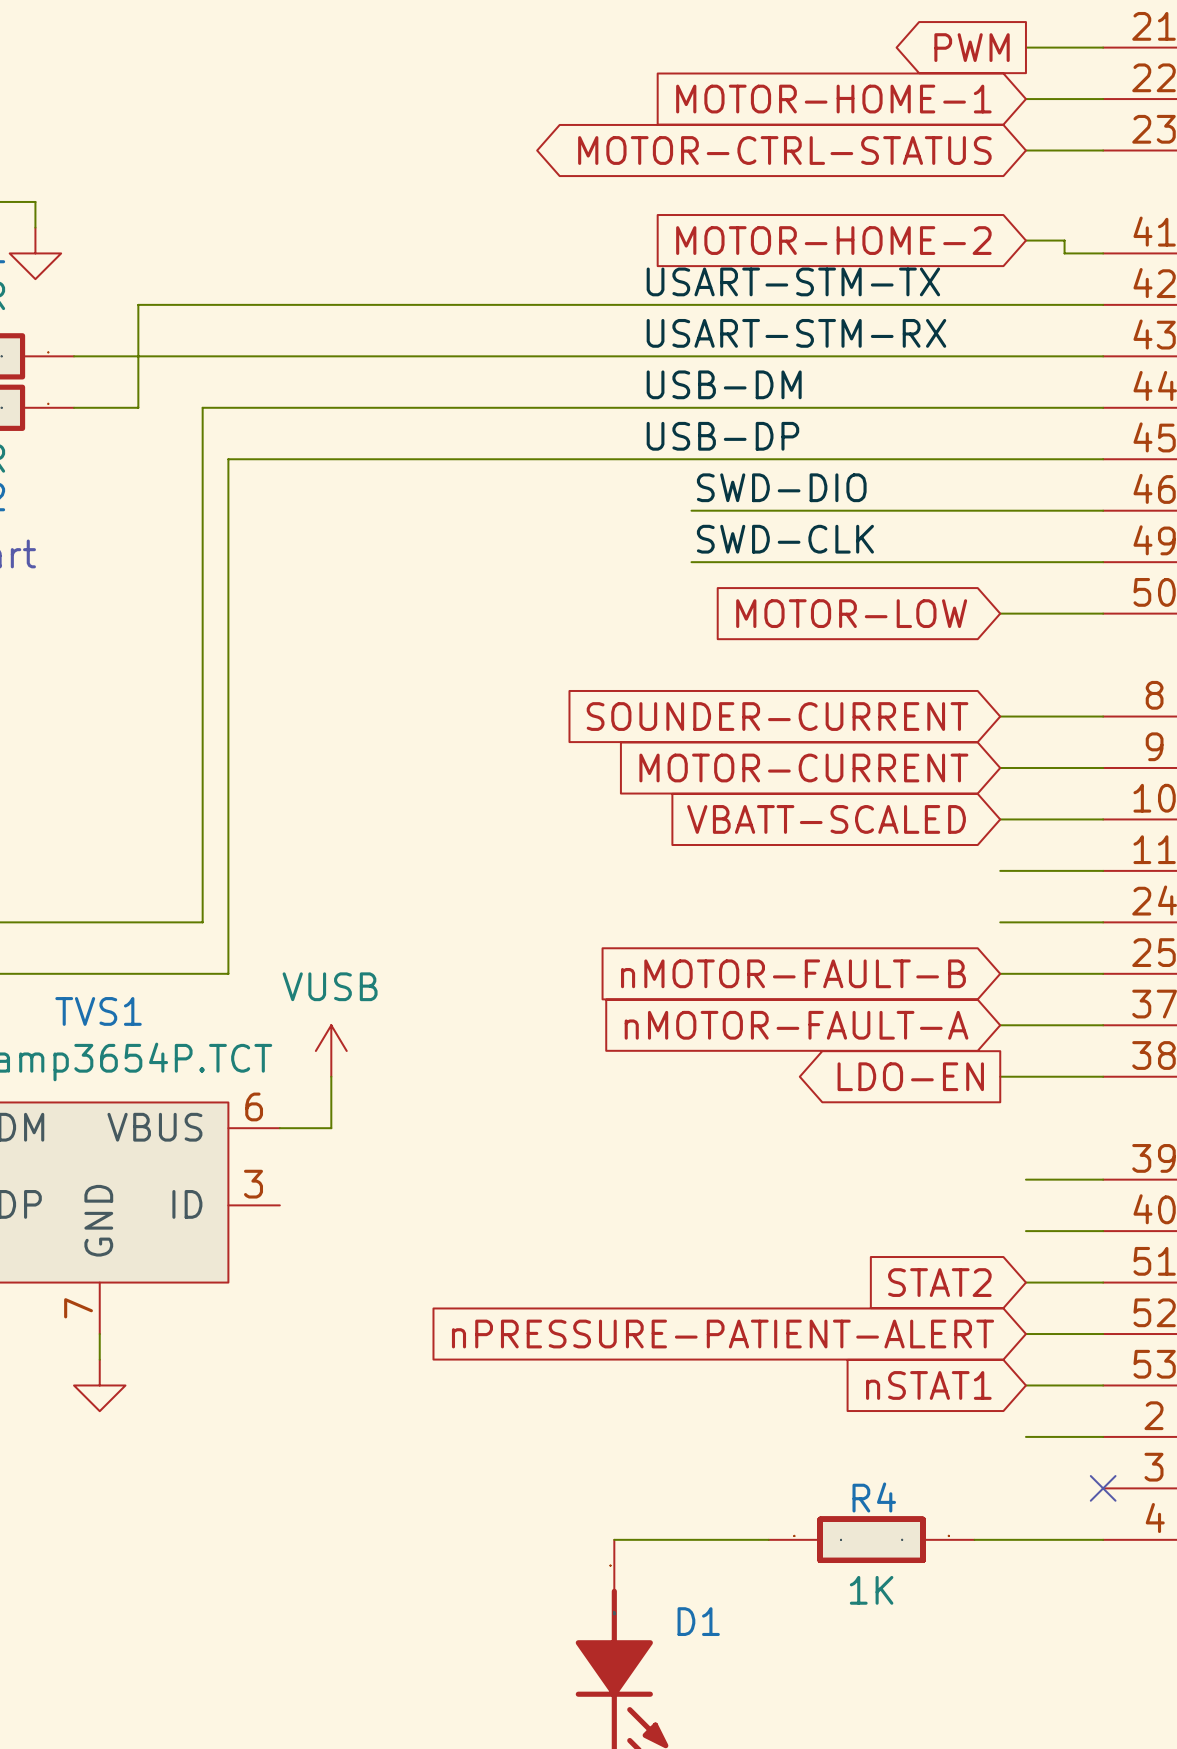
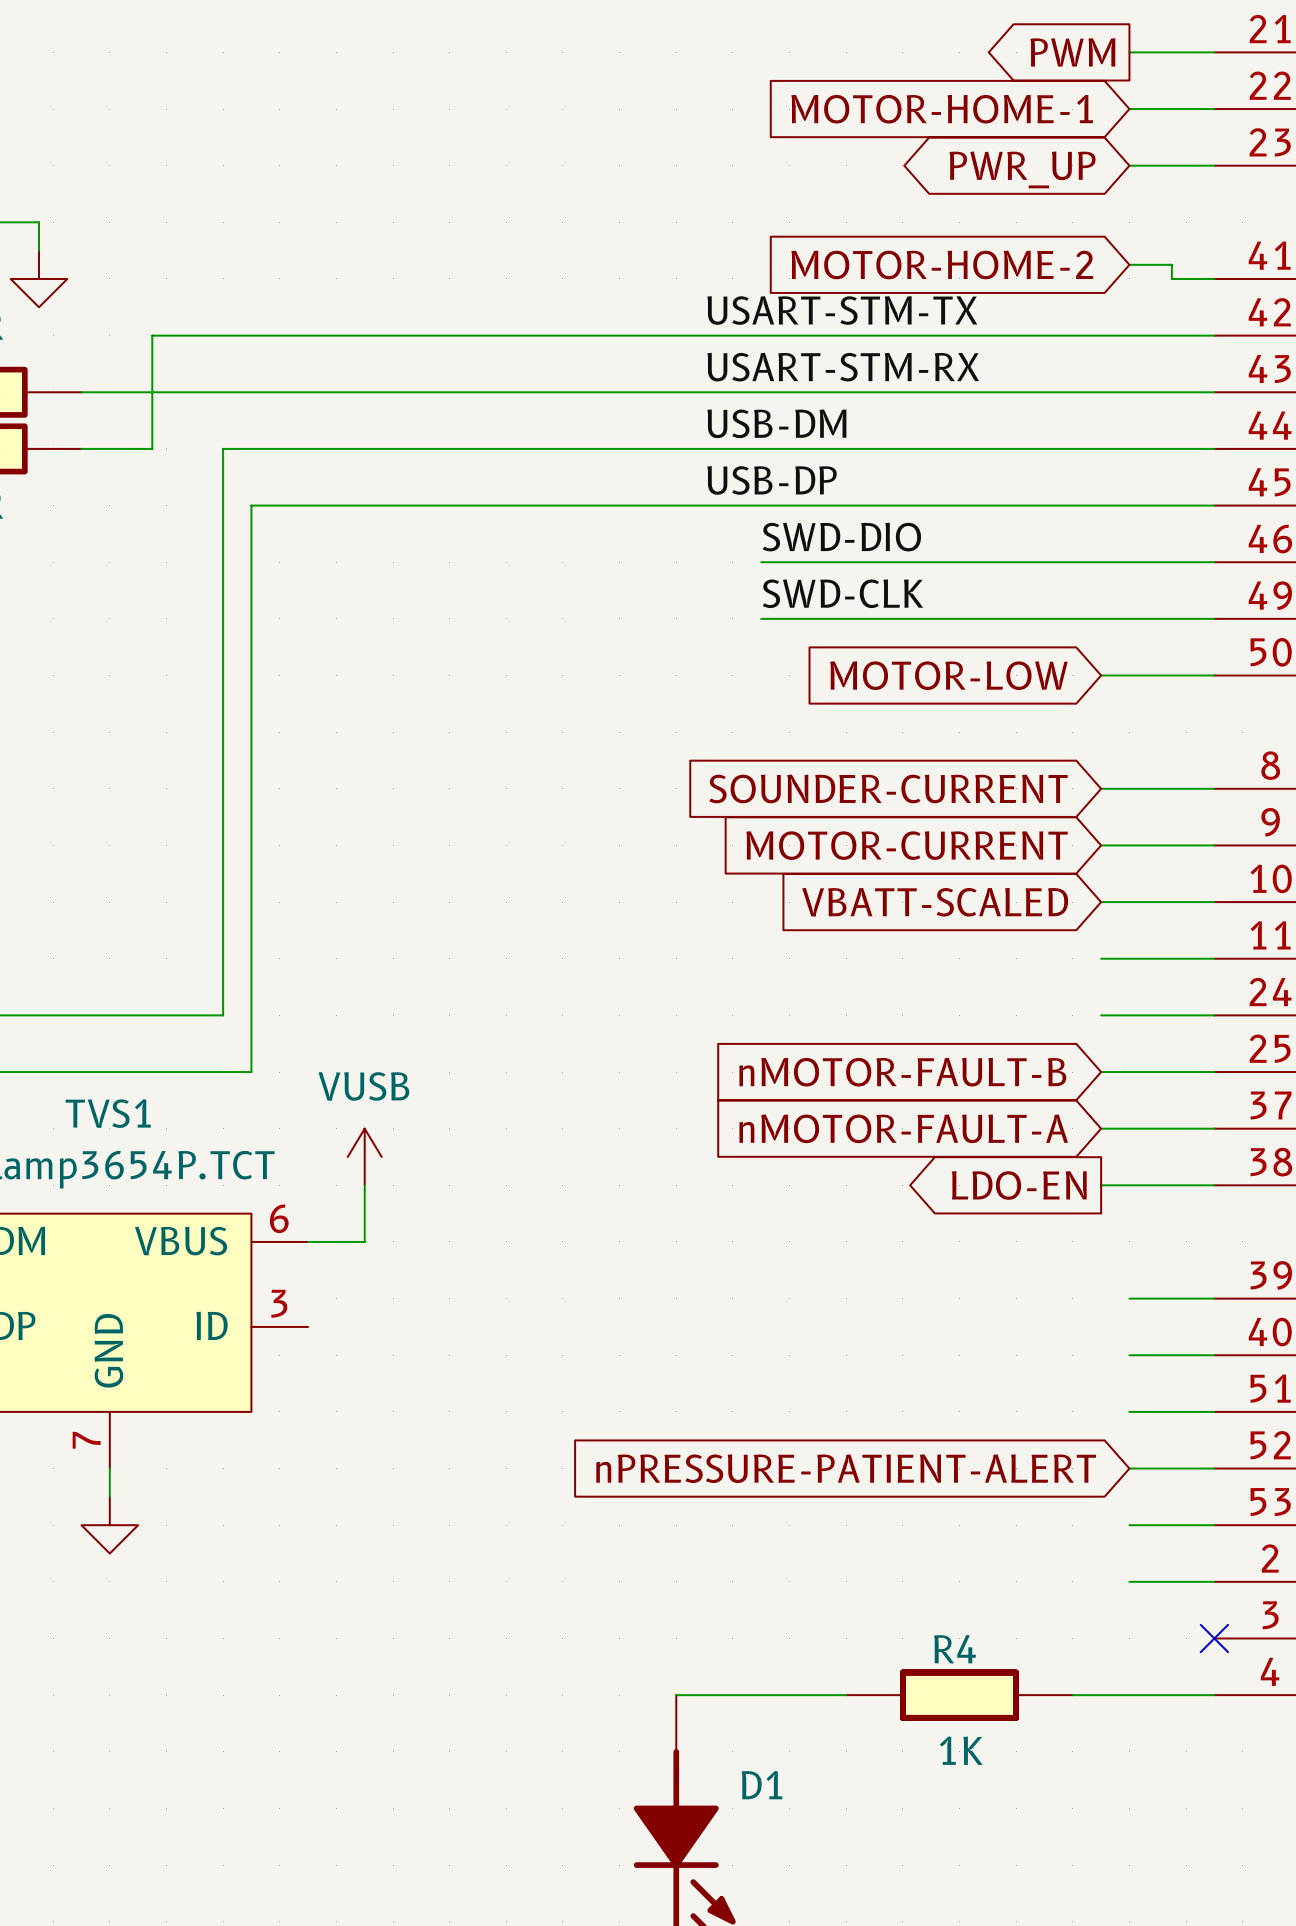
global label: MOTOR-CTRL-STATUS (784, 150) -> PWR_UP (1022, 169)
global label: STAT2 (939, 1282) -> none
global label: nSTAT1 (928, 1385) -> none

